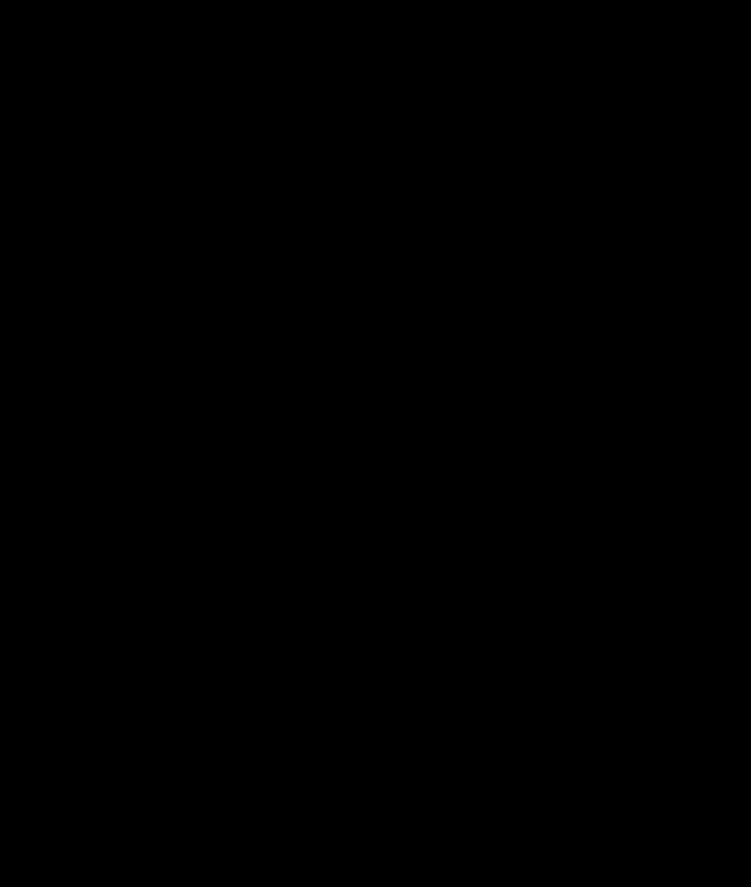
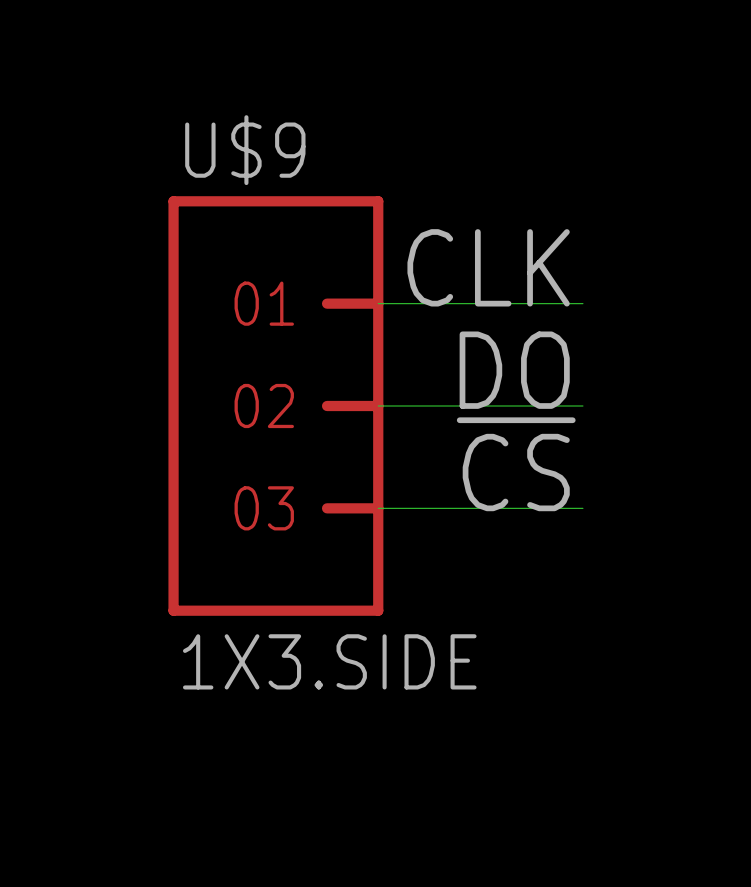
label: none -> CLK (488, 267)
wire: none -> (378, 303) (582, 303)
label: none -> DO (514, 370)
U$9: none -> 1X3.SIDE (275, 406)
wire: none -> (378, 406) (582, 406)
label: none -> ~{CS} (516, 464)
wire: none -> (378, 508) (582, 508)

